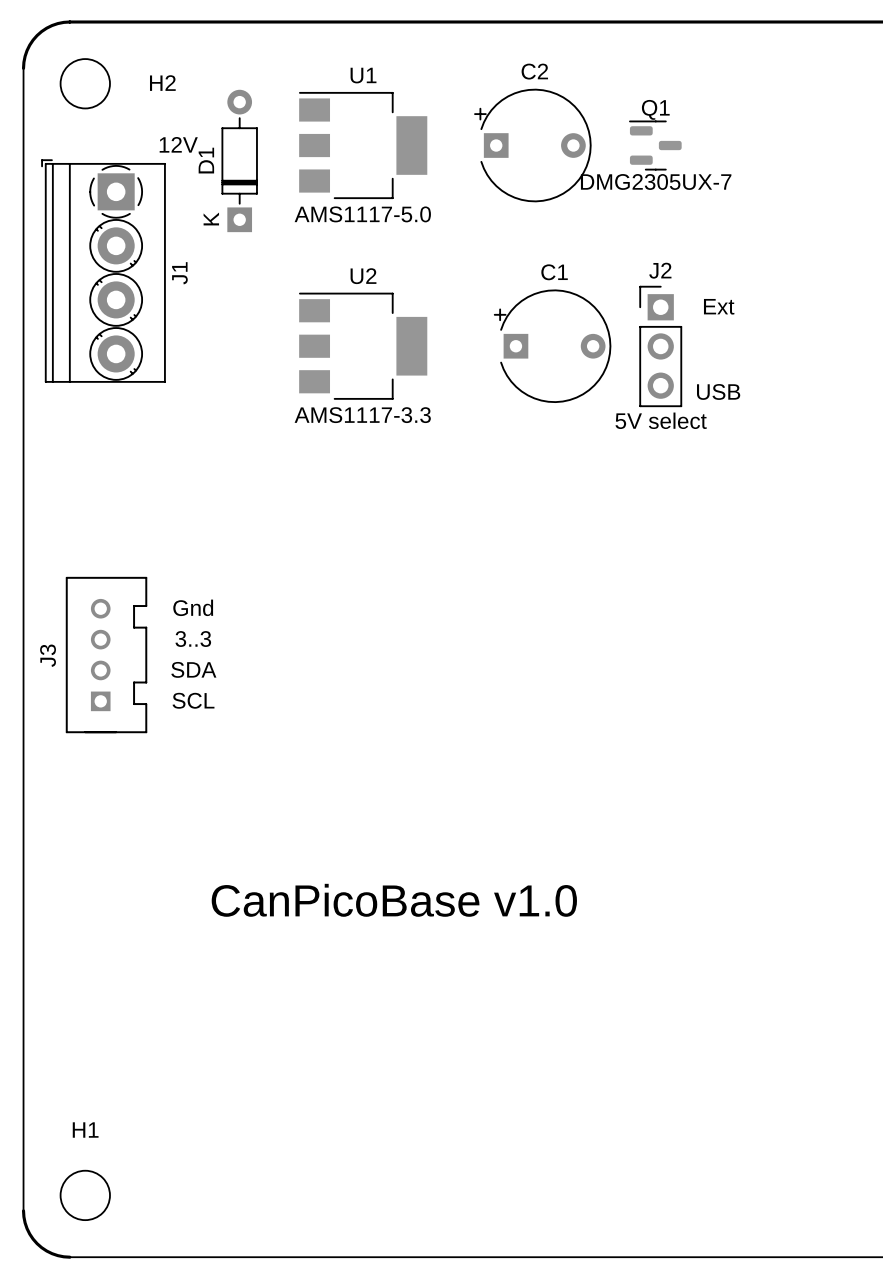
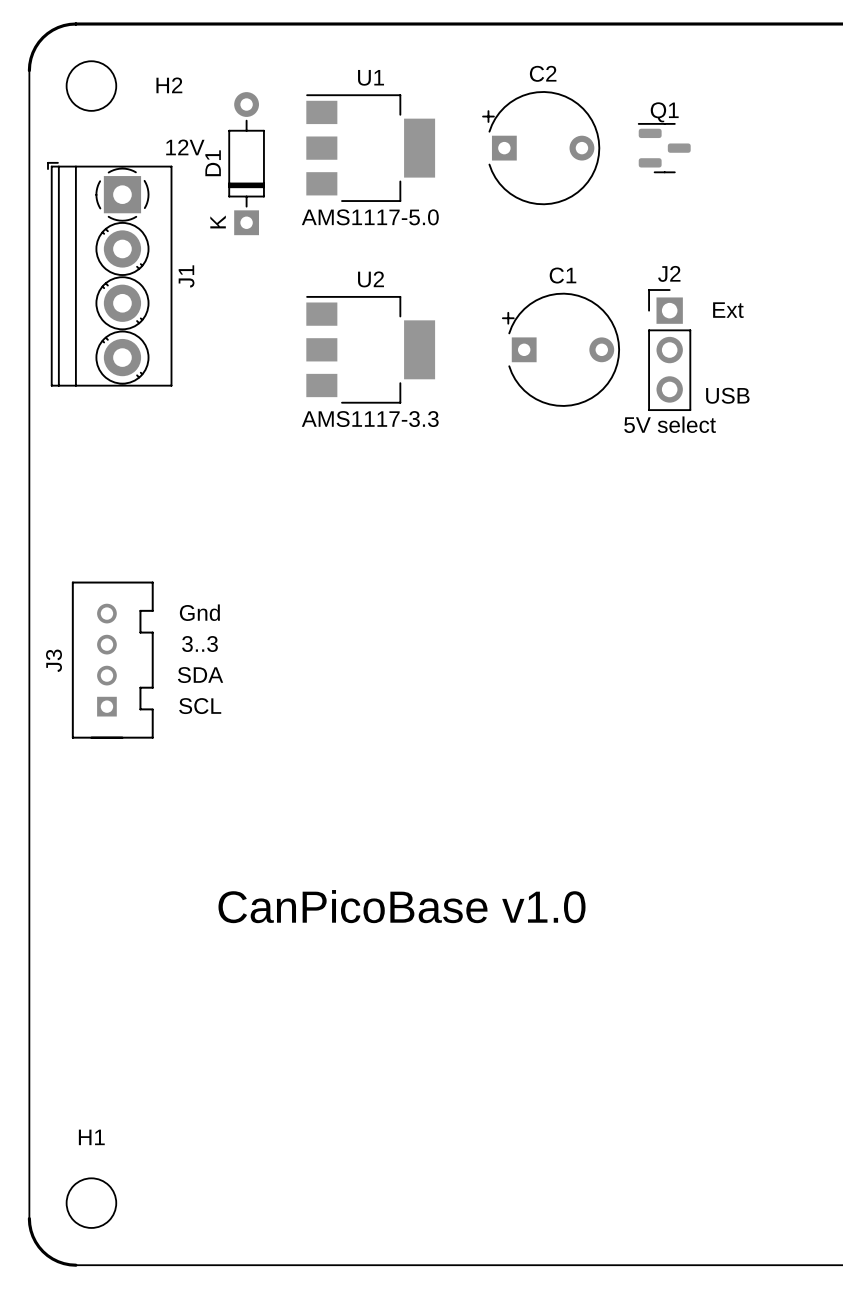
Q1 value: DMG2305UX-7 (656, 181) -> none

